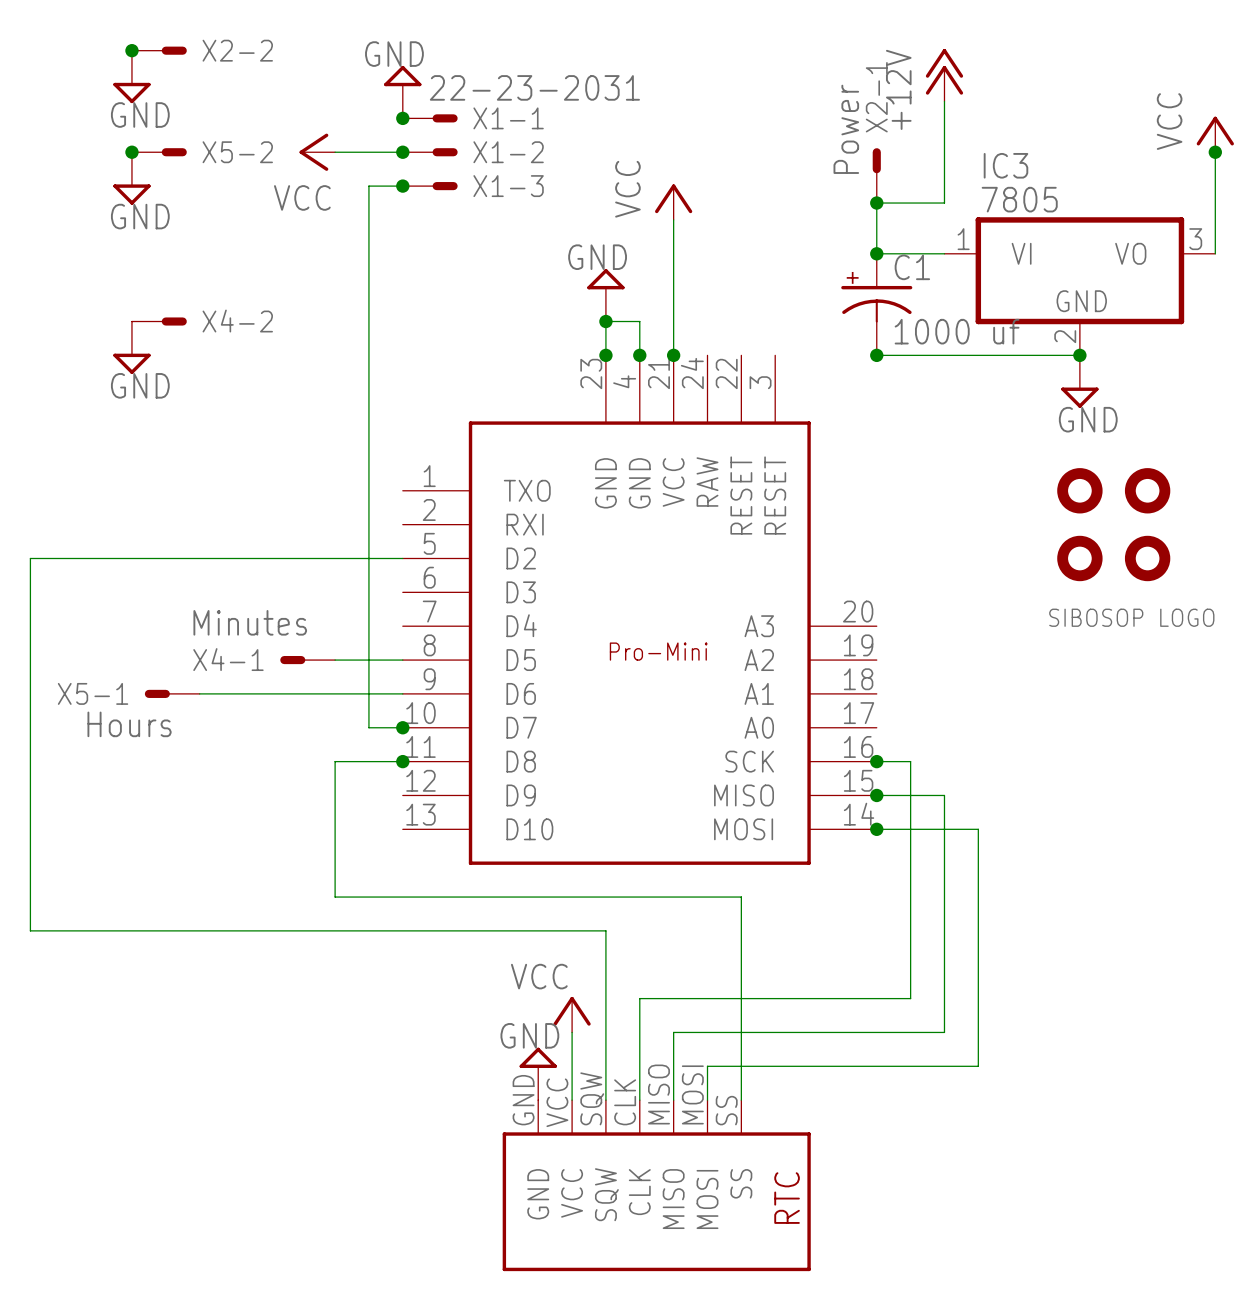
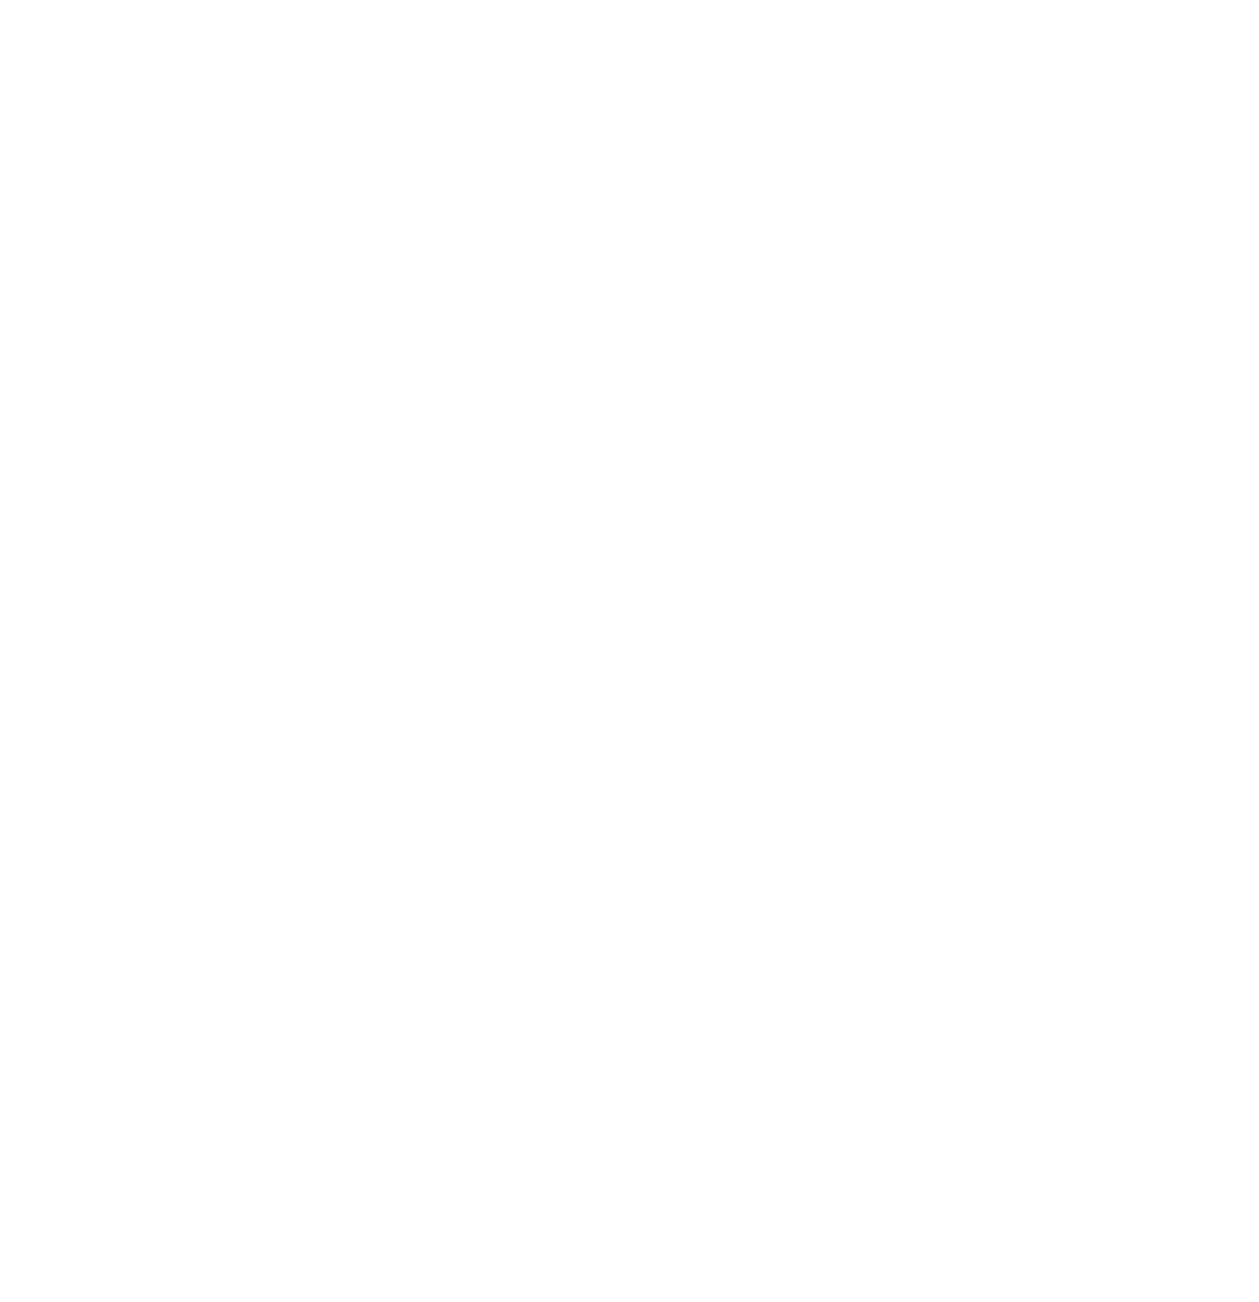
junction: (131, 50) -> none
X2-2: (159, 50) -> none
power symbol: +12V (944, 75) -> none
power symbol: GND (131, 76) -> none
power symbol: GND (402, 92) -> none
wire: (944, 101) (944, 203) (876, 203) (876, 253) (944, 253) -> none
junction: (402, 118) -> none
X1-1: 22-23-2031 (430, 118) -> none
power symbol: VCC (1215, 134) -> none
junction: (131, 152) -> none
X5-2: (159, 152) -> none
power symbol: VCC (317, 152) -> none
wire: (335, 152) (402, 152) -> none
junction: (402, 152) -> none
X1-2: (430, 152) -> none
wire: (1215, 152) (1215, 253) -> none
junction: (1215, 152) -> none
X2-1: Power (876, 175) -> none
power symbol: GND (131, 178) -> none
wire: (402, 186) (368, 186) (368, 727) (402, 727) -> none
junction: (402, 186) -> none
X1-3: (430, 186) -> none
power symbol: VCC (673, 202) -> none
junction: (876, 203) -> none
wire: (673, 219) (673, 355) -> none
junction: (876, 253) -> none
IC3: 7805 (1079, 286) -> none
power symbol: GND (605, 295) -> none
C1: 1000 uf (876, 304) -> none
X4-2: (159, 321) -> none
junction: (605, 321) -> none
power symbol: GND (131, 347) -> none
wire: (605, 355) (605, 321) (639, 321) (639, 355) -> none
junction: (605, 355) -> none
junction: (639, 355) -> none
junction: (673, 355) -> none
wire: (876, 355) (1079, 355) -> none
junction: (876, 355) -> none
junction: (1079, 355) -> none
power symbol: GND (1079, 381) -> none
part: (1079, 490) -> none
part: (1147, 490) -> none
wire: (402, 558) (30, 558) (30, 930) (605, 930) (605, 1100) -> none
part: (1079, 558) -> none
part: (1147, 558) -> none
part: (639, 610) -> none
part: (1131, 617) -> none
X4-1: Minutes (307, 660) -> none
wire: (335, 660) (402, 660) -> none
X5-1: Hours (172, 693) -> none
wire: (199, 693) (402, 693) -> none
junction: (402, 727) -> none
wire: (402, 761) (335, 761) (335, 897) (741, 897) (741, 1100) -> none
junction: (402, 761) -> none
wire: (876, 761) (910, 761) (910, 998) (639, 998) (639, 1100) -> none
junction: (876, 761) -> none
wire: (876, 795) (944, 795) (944, 1032) (673, 1032) (673, 1100) -> none
junction: (876, 795) -> none
wire: (876, 829) (978, 829) (978, 1066) (707, 1066) (707, 1100) -> none
junction: (876, 829) -> none
power symbol: VCC (572, 1014) -> none
wire: (572, 1032) (572, 1100) -> none
power symbol: GND (538, 1073) -> none
part: (656, 1185) -> none

